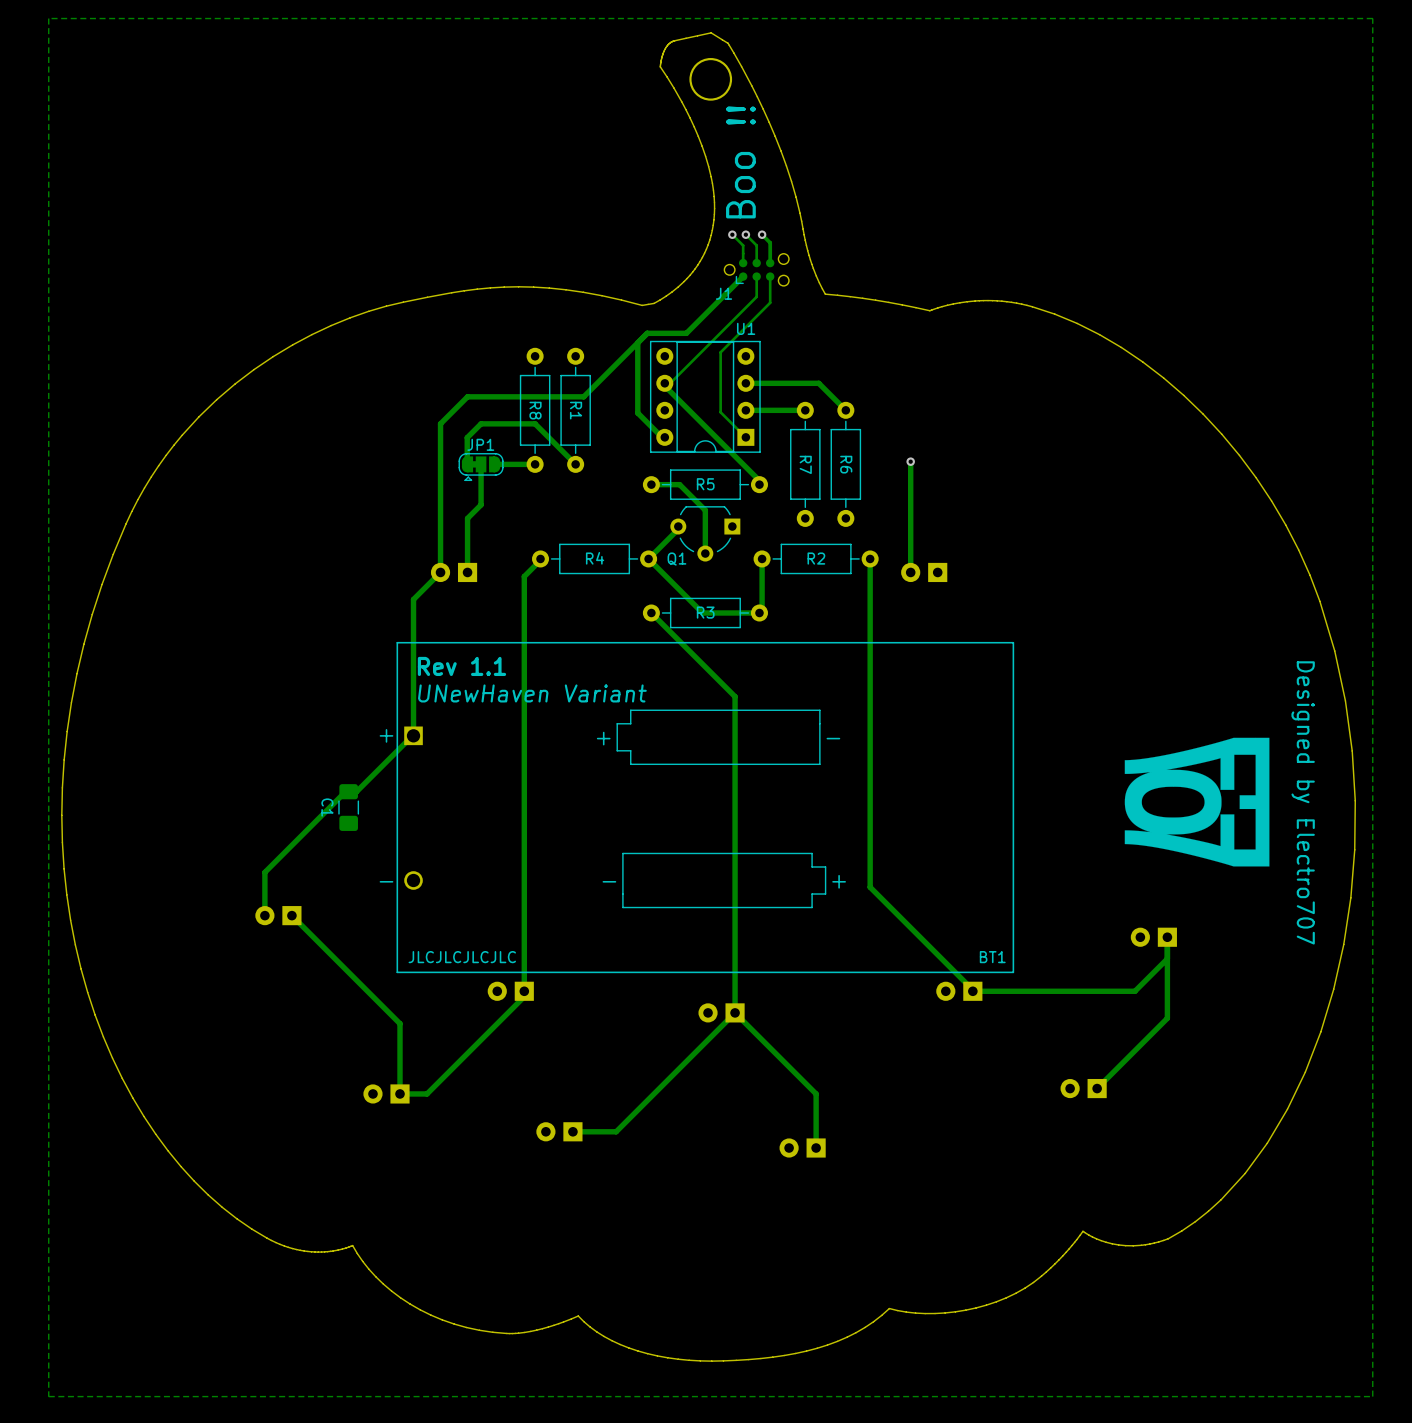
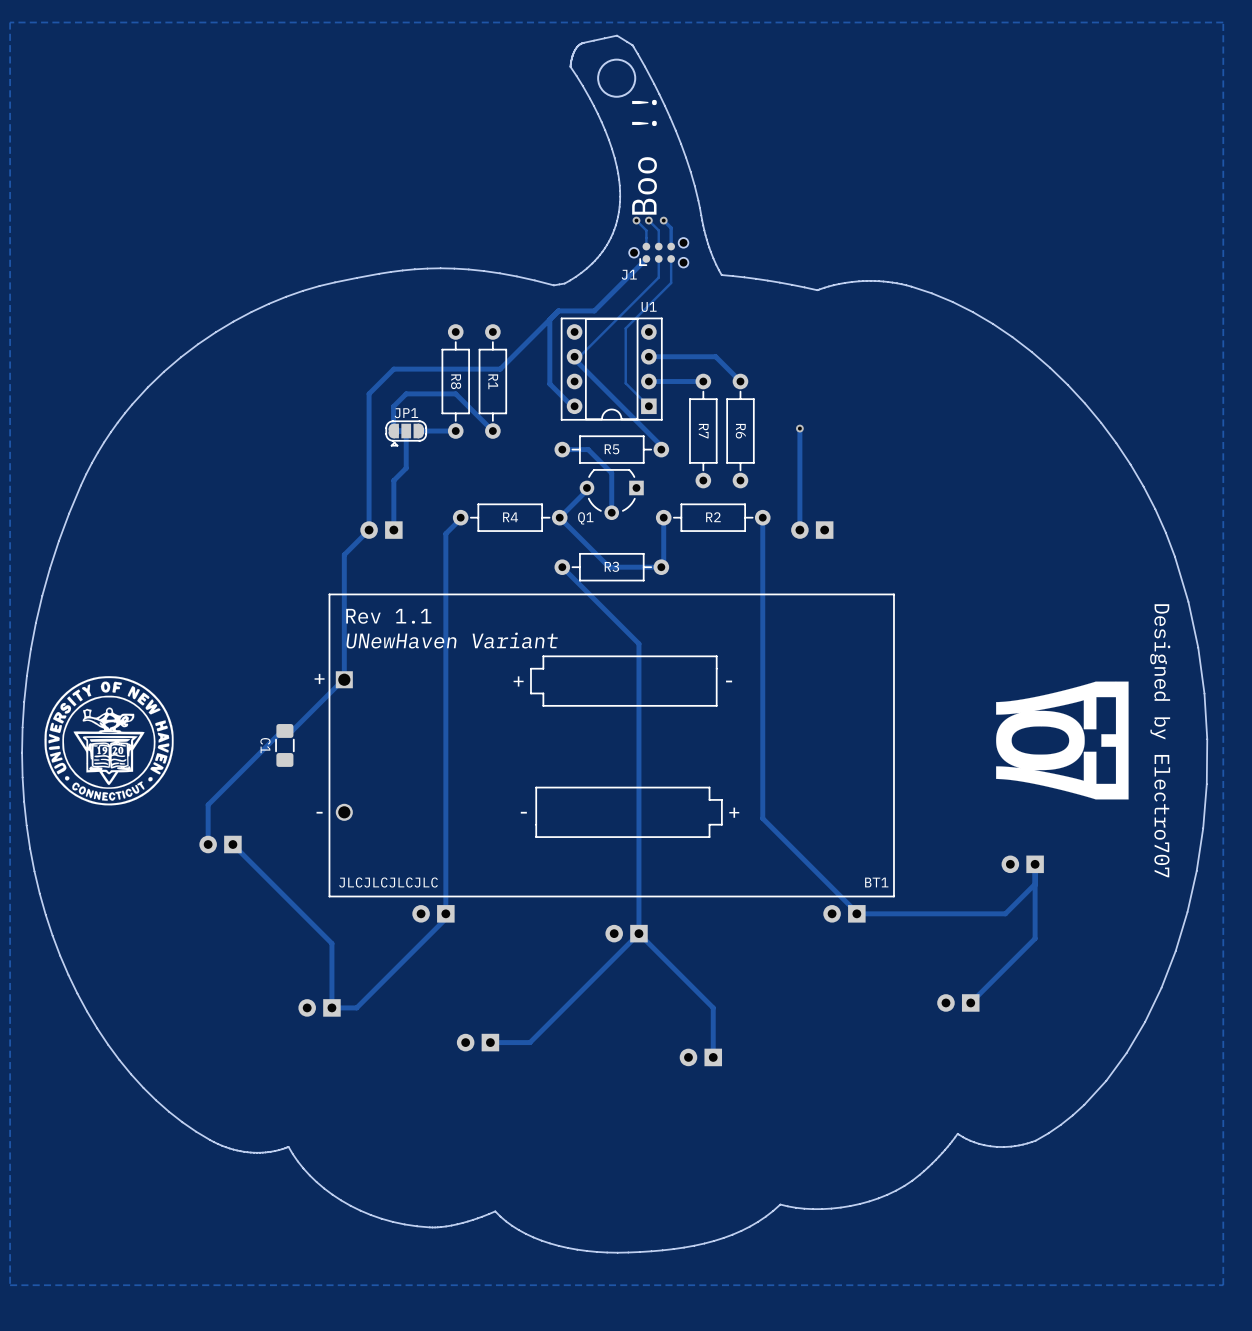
drawing: none -> [44, 676, 174, 806]

